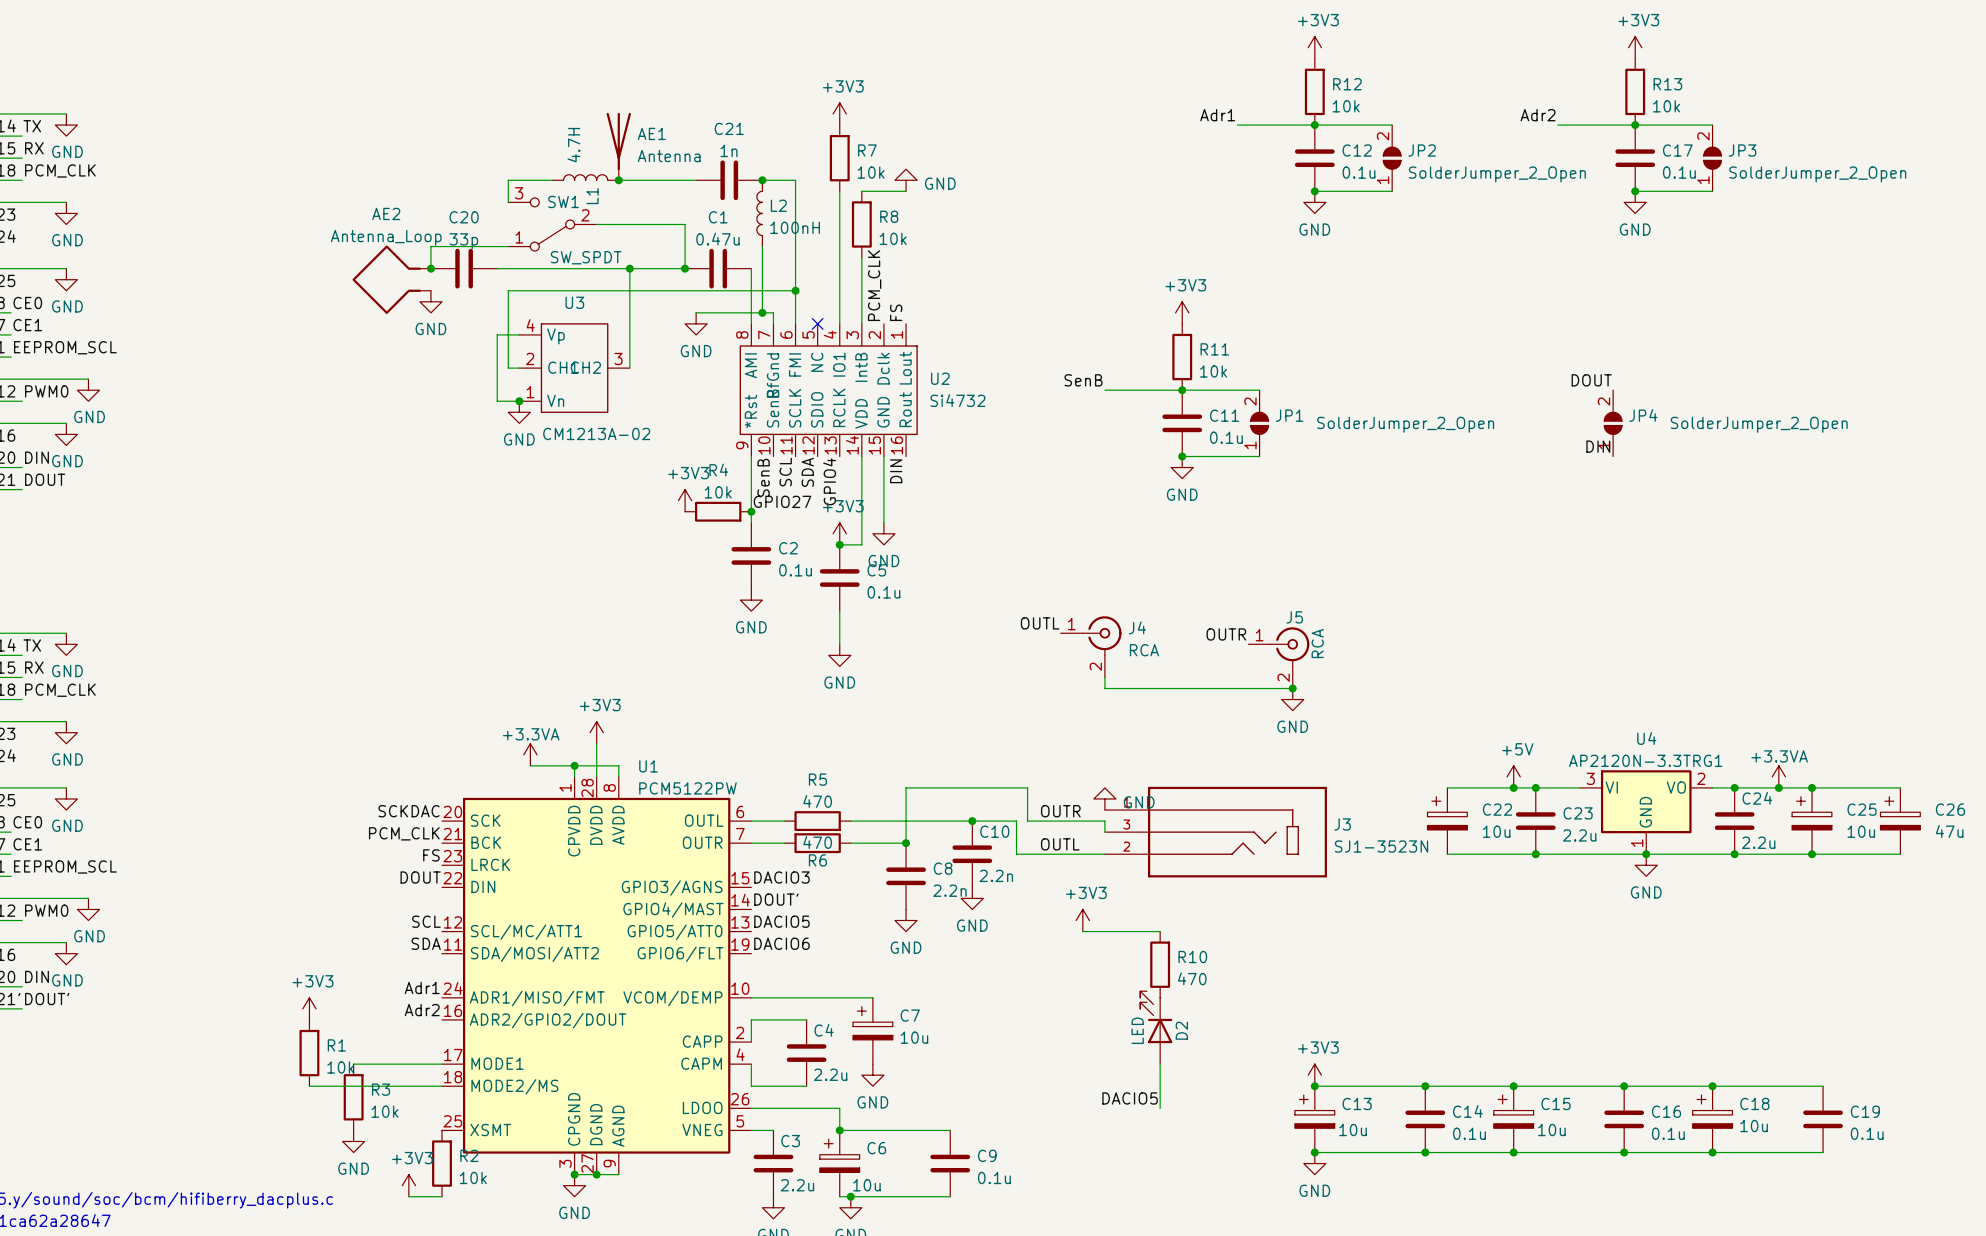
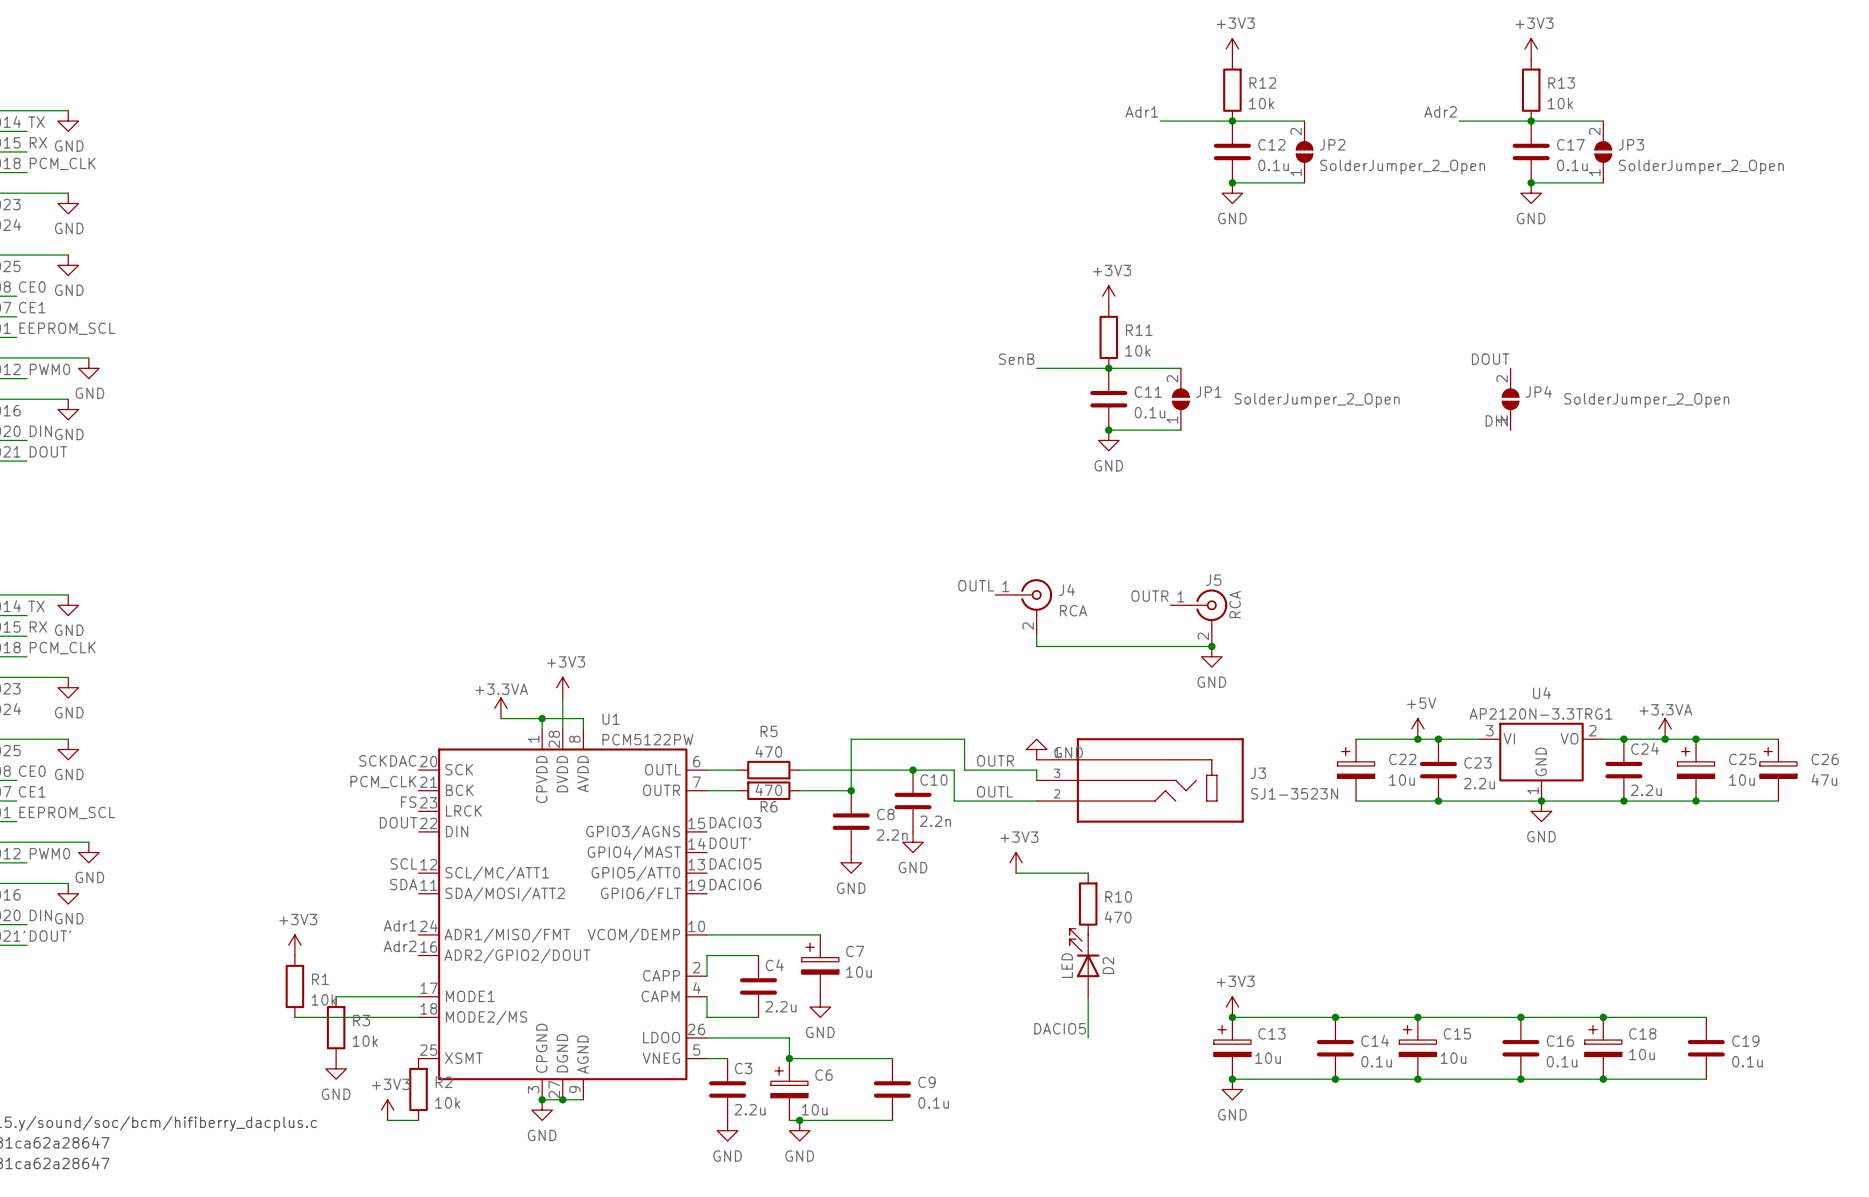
power symbol: +3V3 (839, 113) -> none
AE1: Antenna (618, 146) -> none
R7: 10k (839, 158) -> none
L1: 4.7H (585, 177) -> none
wire: (552, 180) (508, 180) (508, 202) -> none
wire: (618, 180) (696, 180) -> none
junction: (618, 180) -> none
C21: 1n (729, 180) -> none
wire: (762, 180) (795, 180) (795, 323) -> none
junction: (762, 180) -> none
power symbol: GND (906, 180) -> none
wire: (839, 191) (839, 323) -> none
wire: (861, 191) (906, 191) -> none
L2: 100nH (759, 213) -> none
SW1: SW_SPDT (552, 224) -> none
wire: (596, 224) (685, 224) (685, 268) (497, 268) -> none
R8: 10k (861, 224) -> none
wire: (508, 246) (430, 246) (430, 268) -> none
wire: (762, 246) (762, 312) -> none
wire: (861, 257) (861, 323) -> none
junction: (430, 268) -> none
C20: 33p (464, 268) -> none
wire: (629, 268) (629, 368) -> none
junction: (629, 268) -> none
junction: (685, 268) -> none
C1: 0.47u (718, 268) -> none
wire: (751, 268) (751, 323) -> none
AE2: Antenna_Loop (391, 279) -> none
label: PCM_CLK (874, 285) -> none
wire: (795, 290) (508, 290) (508, 368) (519, 368) -> none
junction: (795, 290) -> none
power symbol: GND (430, 301) -> none
wire: (696, 312) (773, 312) (773, 323) -> none
junction: (762, 312) -> none
label: FS (896, 312) -> none
power symbol: GND (696, 323) -> none
no-connect mark: (817, 323) -> none
wire: (519, 334) (497, 334) (497, 401) (519, 401) -> none
U3: CM1213A-02 (574, 368) -> none
U2: Si4732 (828, 390) -> none
junction: (519, 401) -> none
power symbol: GND (519, 412) -> none
wire: (751, 456) (751, 522) -> none
wire: (861, 456) (861, 544) (839, 544) -> none
wire: (883, 456) (883, 522) -> none
label: DIN (896, 471) -> none
label: SCL (785, 472) -> none
label: SDA (807, 472) -> none
label: SenB (763, 477) -> none
label: GPIO4 (829, 481) -> none
power symbol: +3V3 (685, 500) -> none
label: GPIO27 (782, 501) -> none
R4: 10k (718, 511) -> none
junction: (751, 511) -> none
power symbol: +3V3 (839, 533) -> none
power symbol: GND (883, 533) -> none
junction: (839, 544) -> none
C2: 0.1u (751, 555) -> none
C5: 0.1u (839, 578) -> none
power symbol: GND (751, 600) -> none
wire: (839, 611) (839, 644) -> none
power symbol: GND (839, 655) -> none

